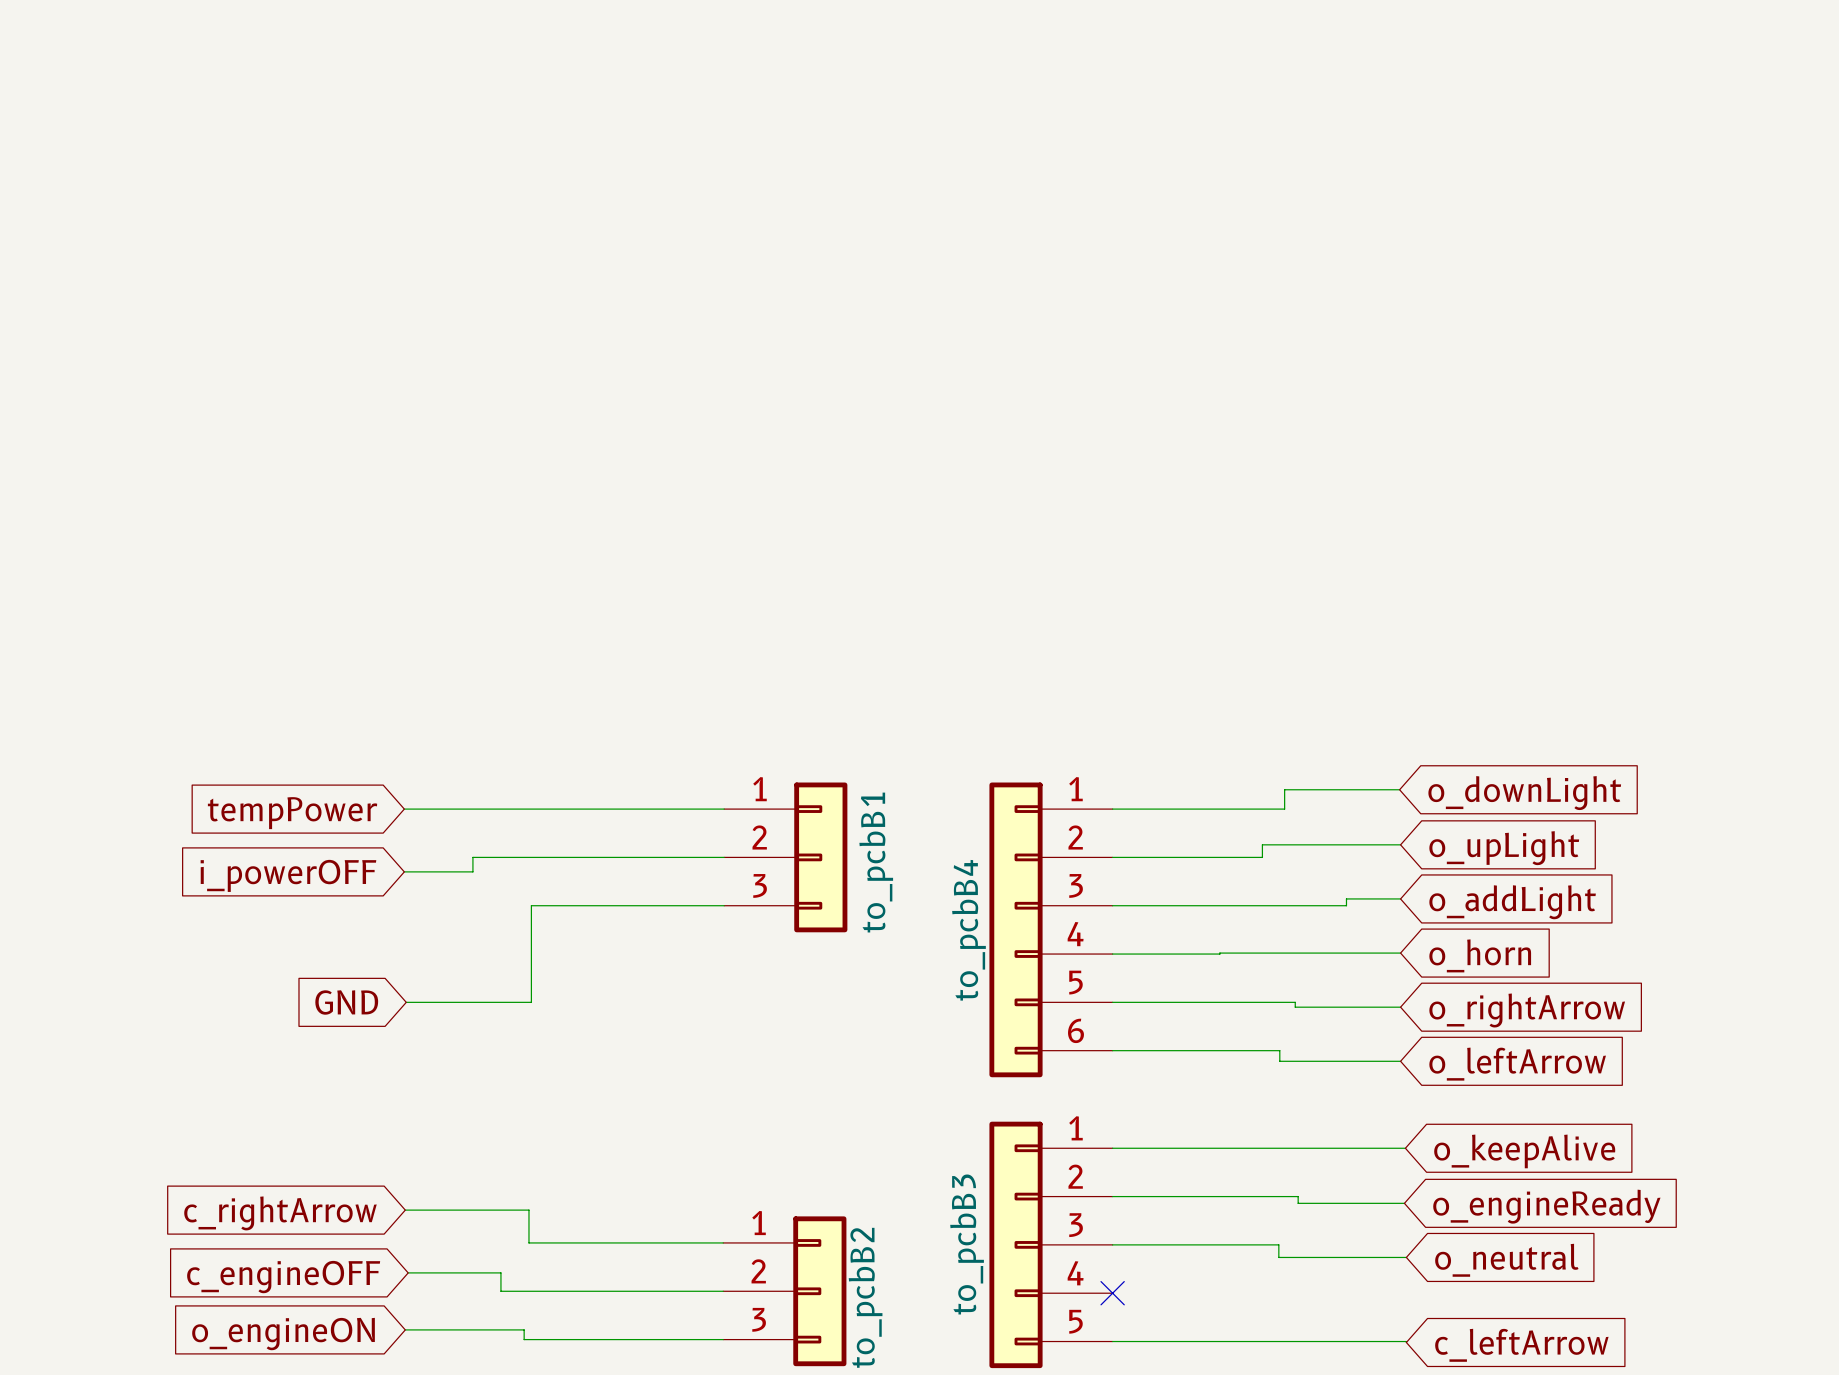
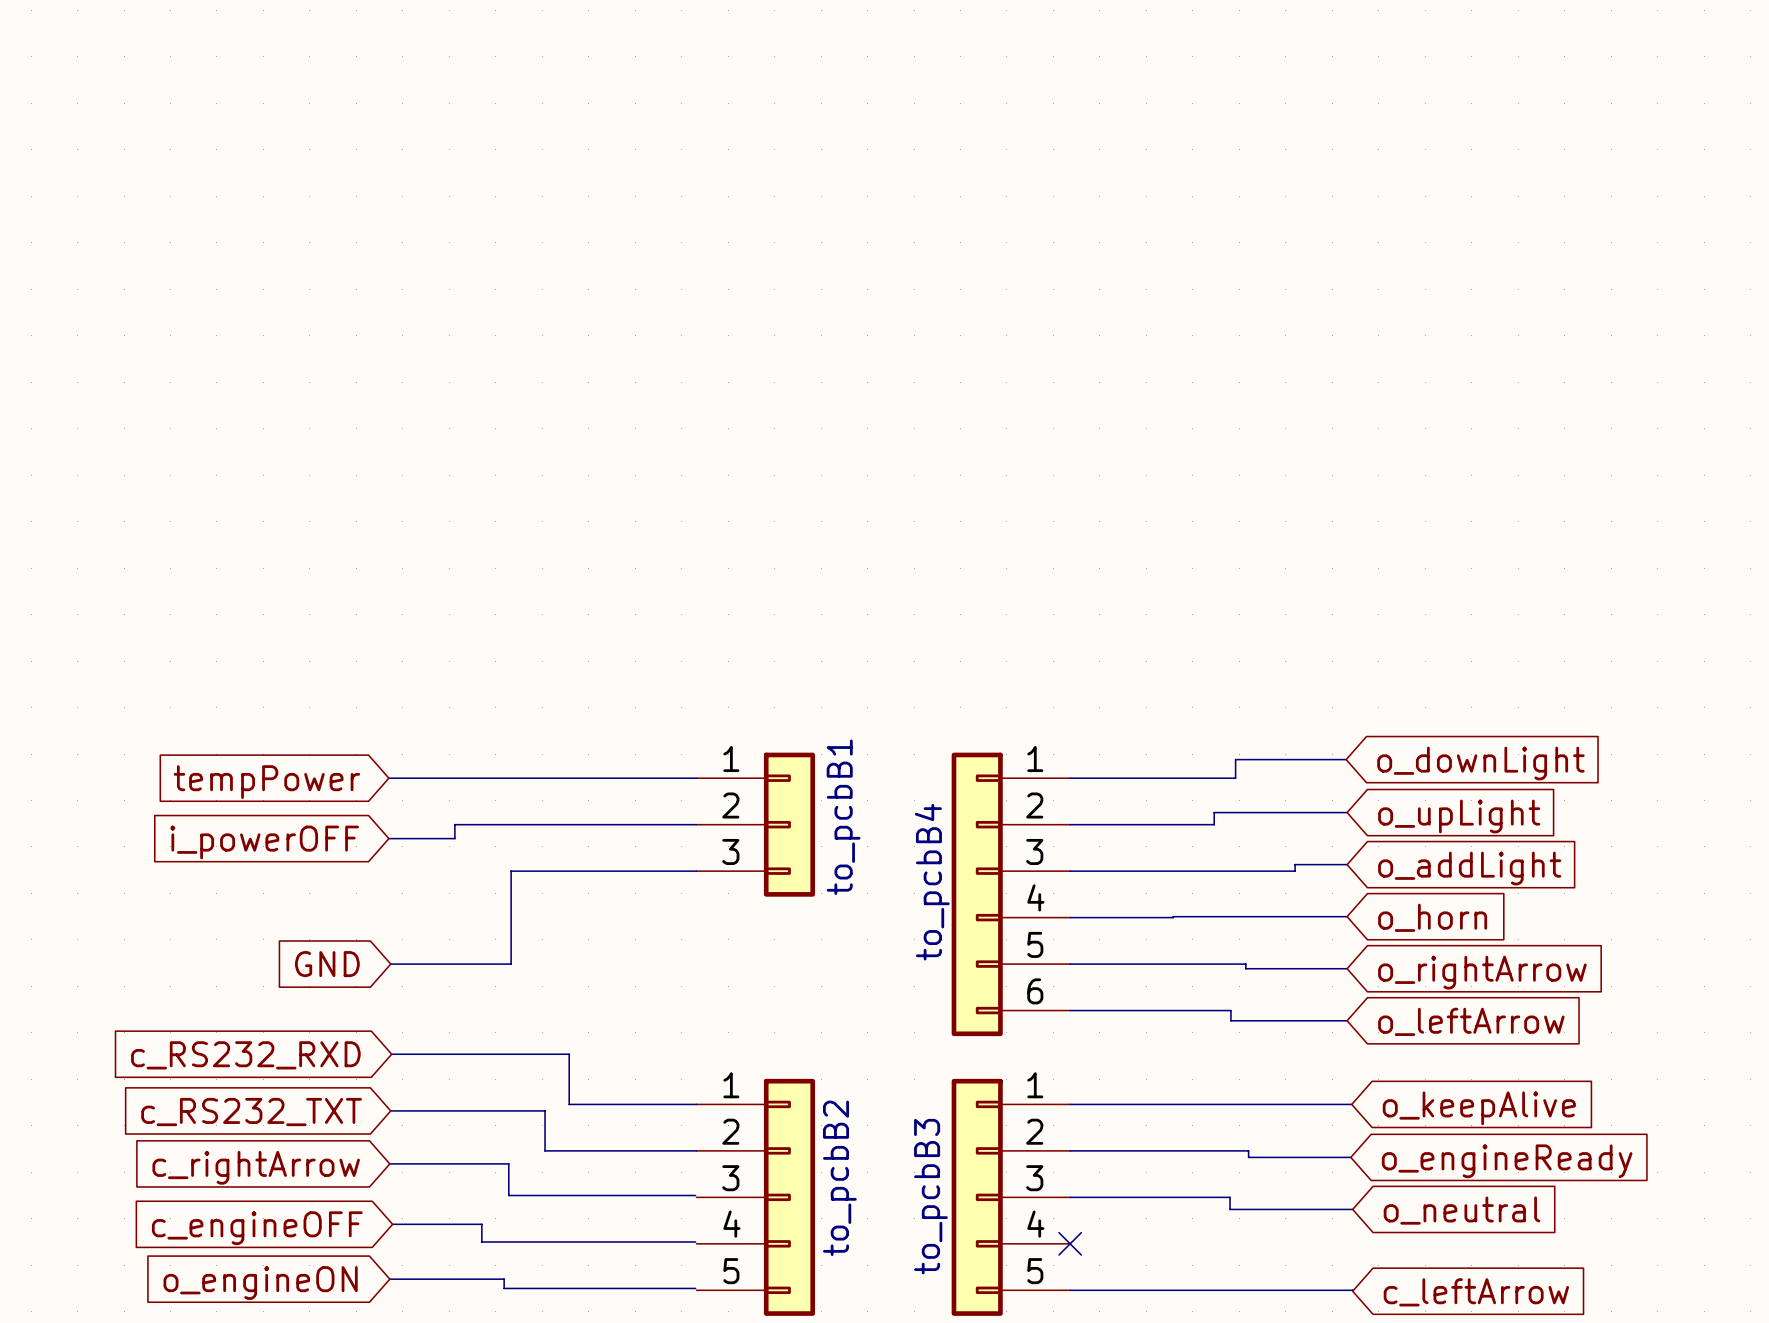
wire: none -> (391, 1054) (569, 1054) (569, 1104) (696, 1104)
global label: none -> c_RS232_RXD (245, 1055)
wire: none -> (390, 1110) (545, 1110) (545, 1150) (696, 1150)
global label: none -> c_RS232_TXT (251, 1112)
to_pcbB2 symbol: [723, 1216, 847, 1367] -> [696, 1078, 816, 1316]

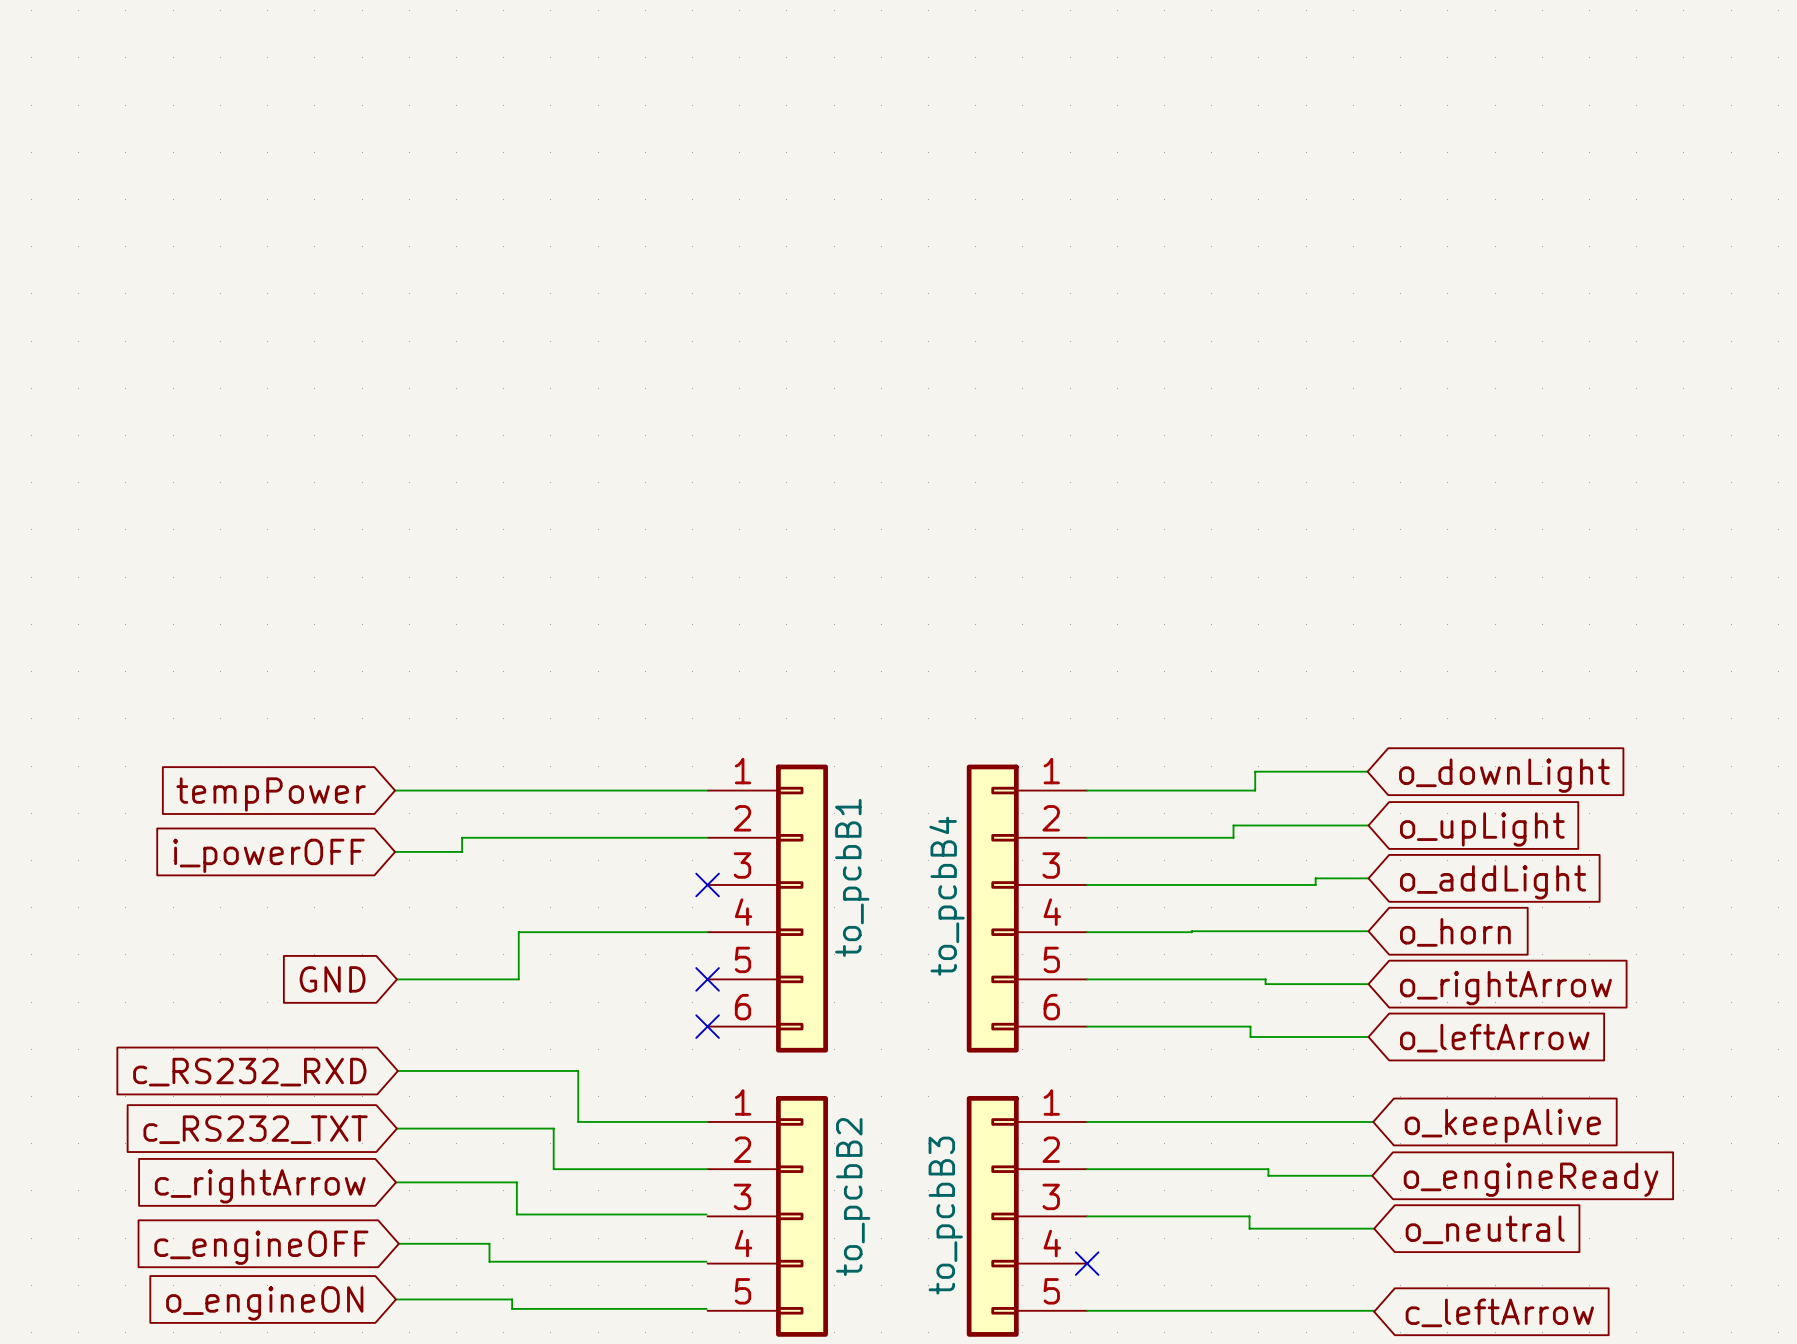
to_pcbB1 symbol: [696, 752, 816, 897] -> [707, 764, 828, 1053]
wire: (696, 871) (511, 871) (510, 964) -> (707, 932) (518, 932) (518, 979)
no-connect mark: none -> (707, 884)
no-connect mark: none -> (707, 979)
no-connect mark: none -> (707, 1026)

